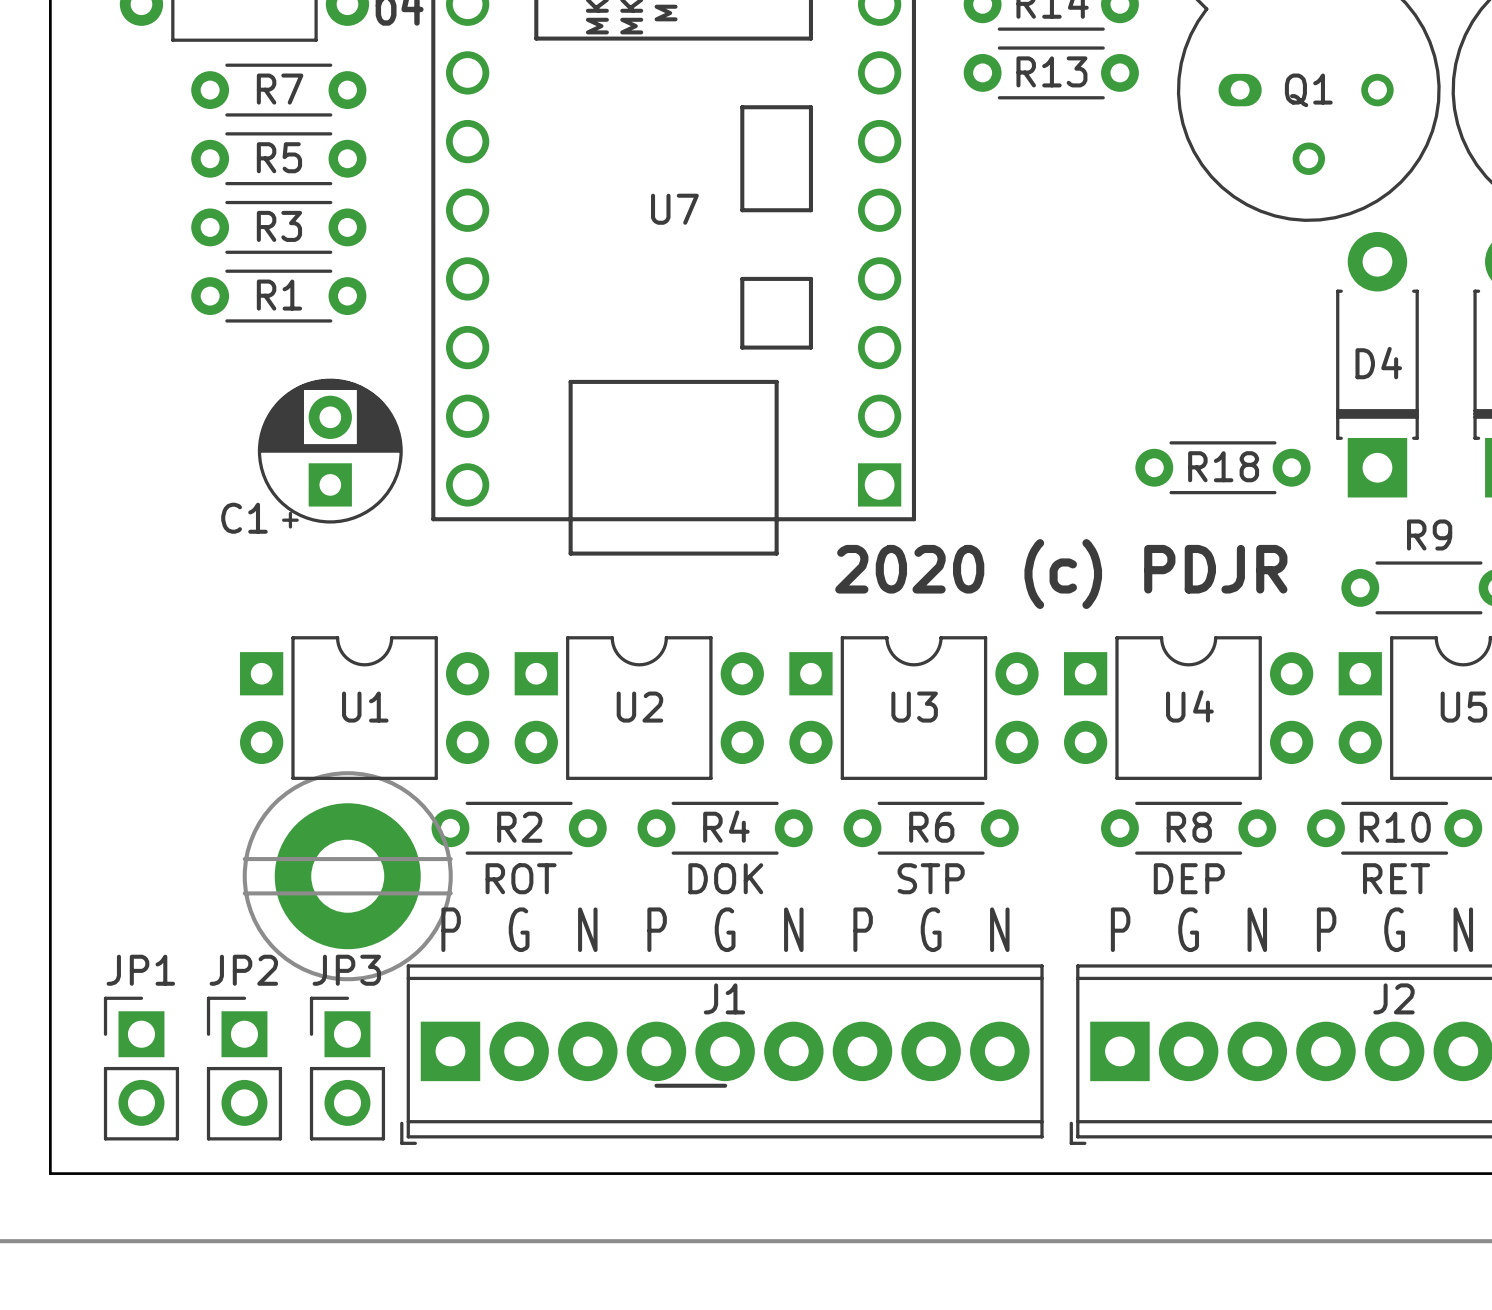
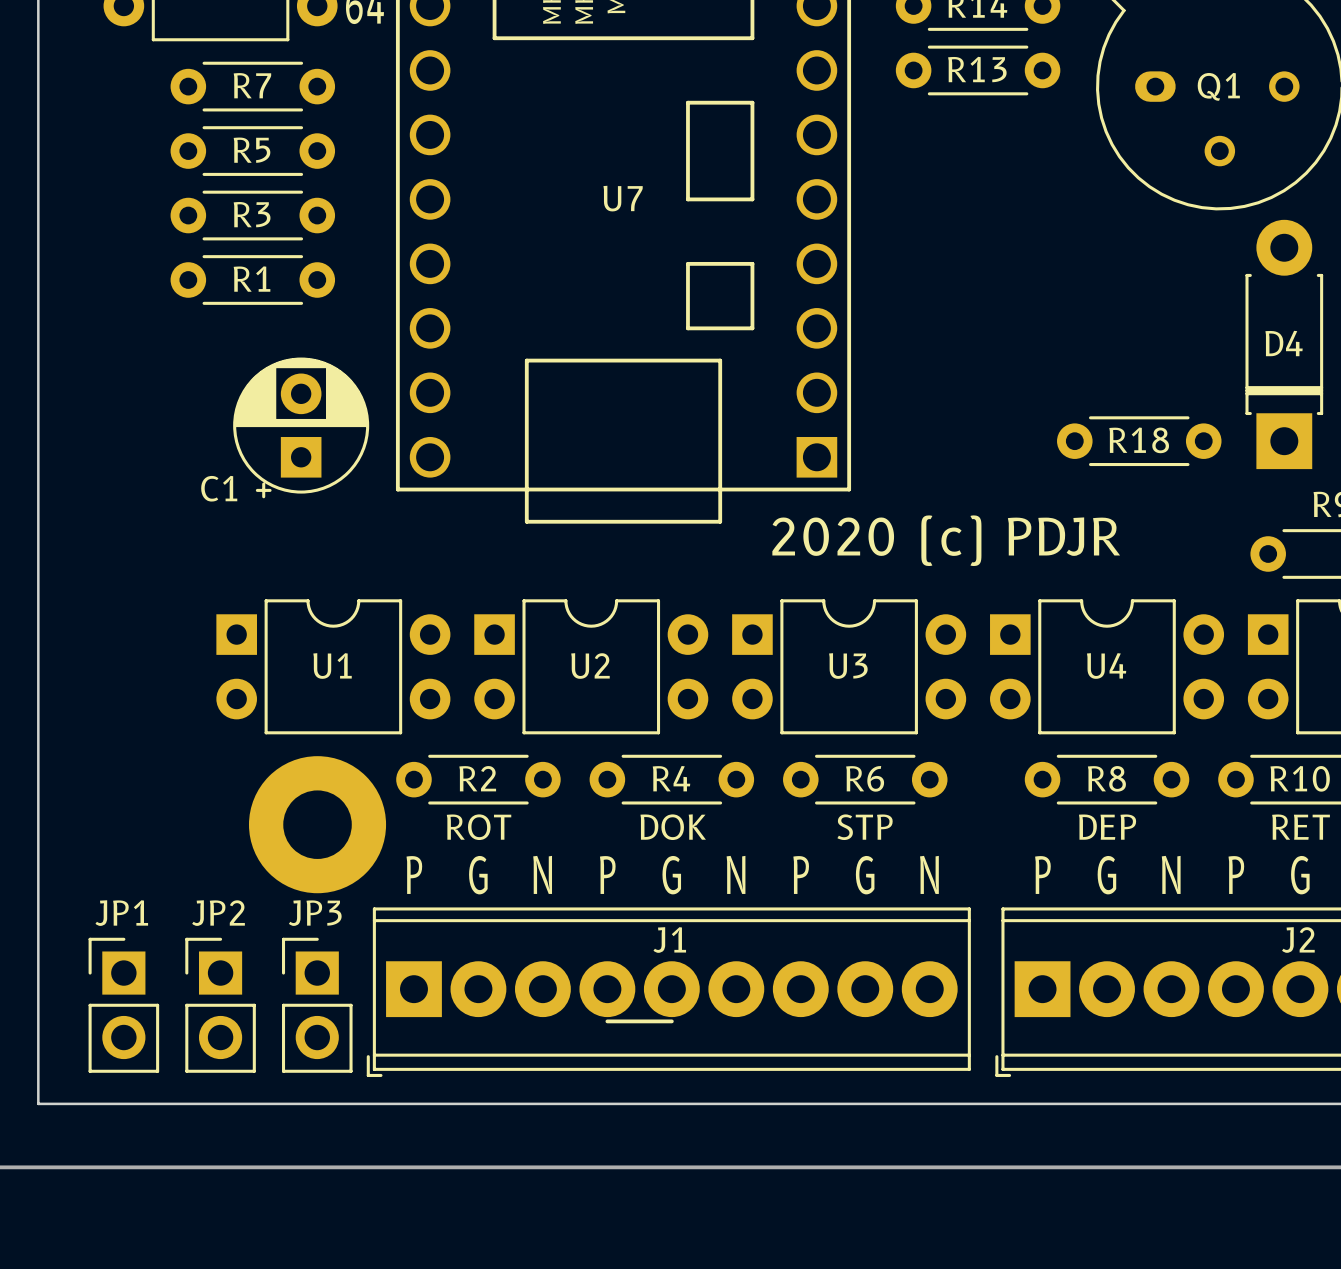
drawing: [242, 771, 453, 982] -> none
line: (244, 859) (450, 859) -> none
line: (244, 893) (450, 893) -> none

